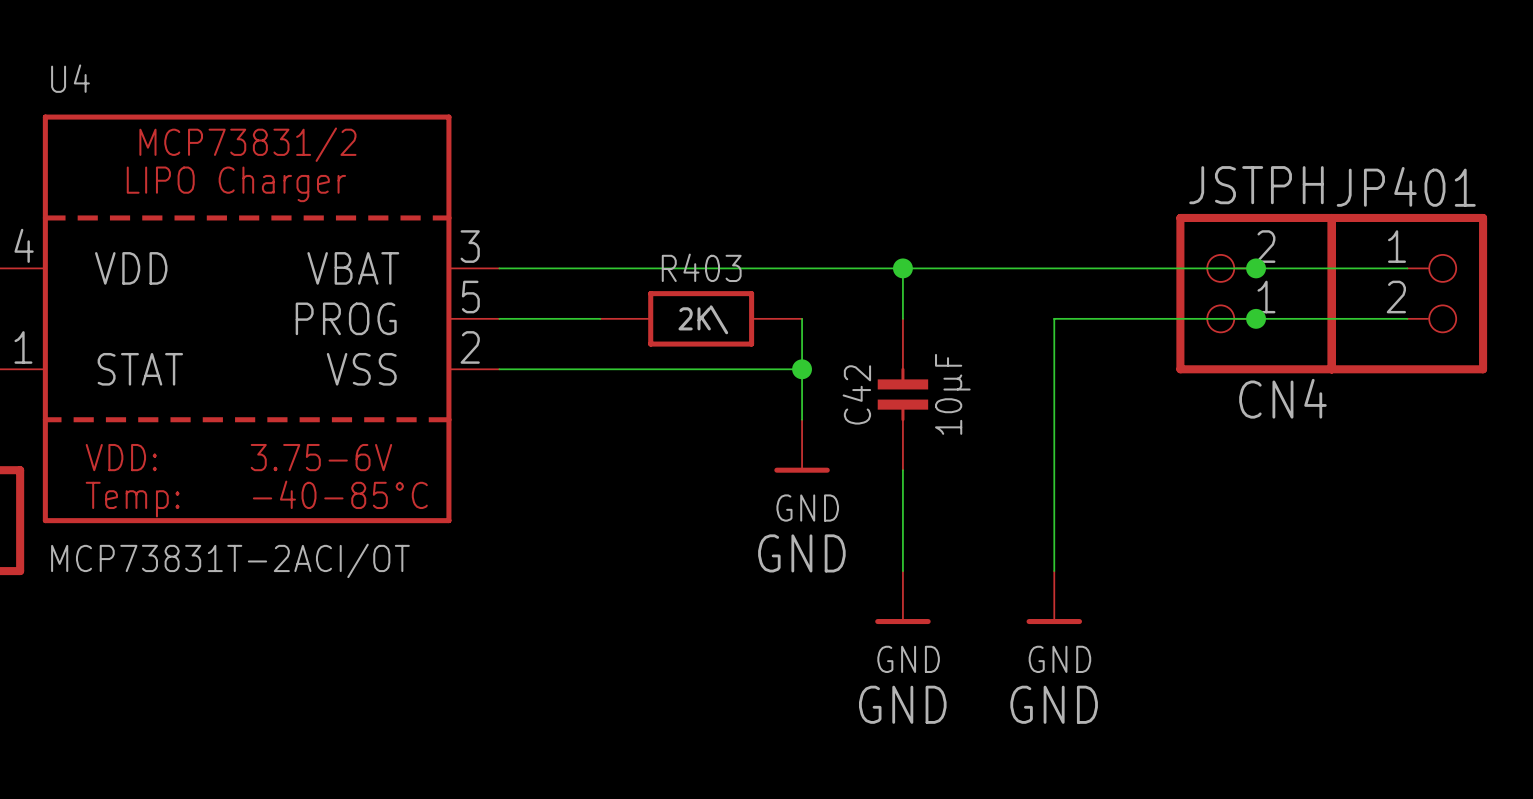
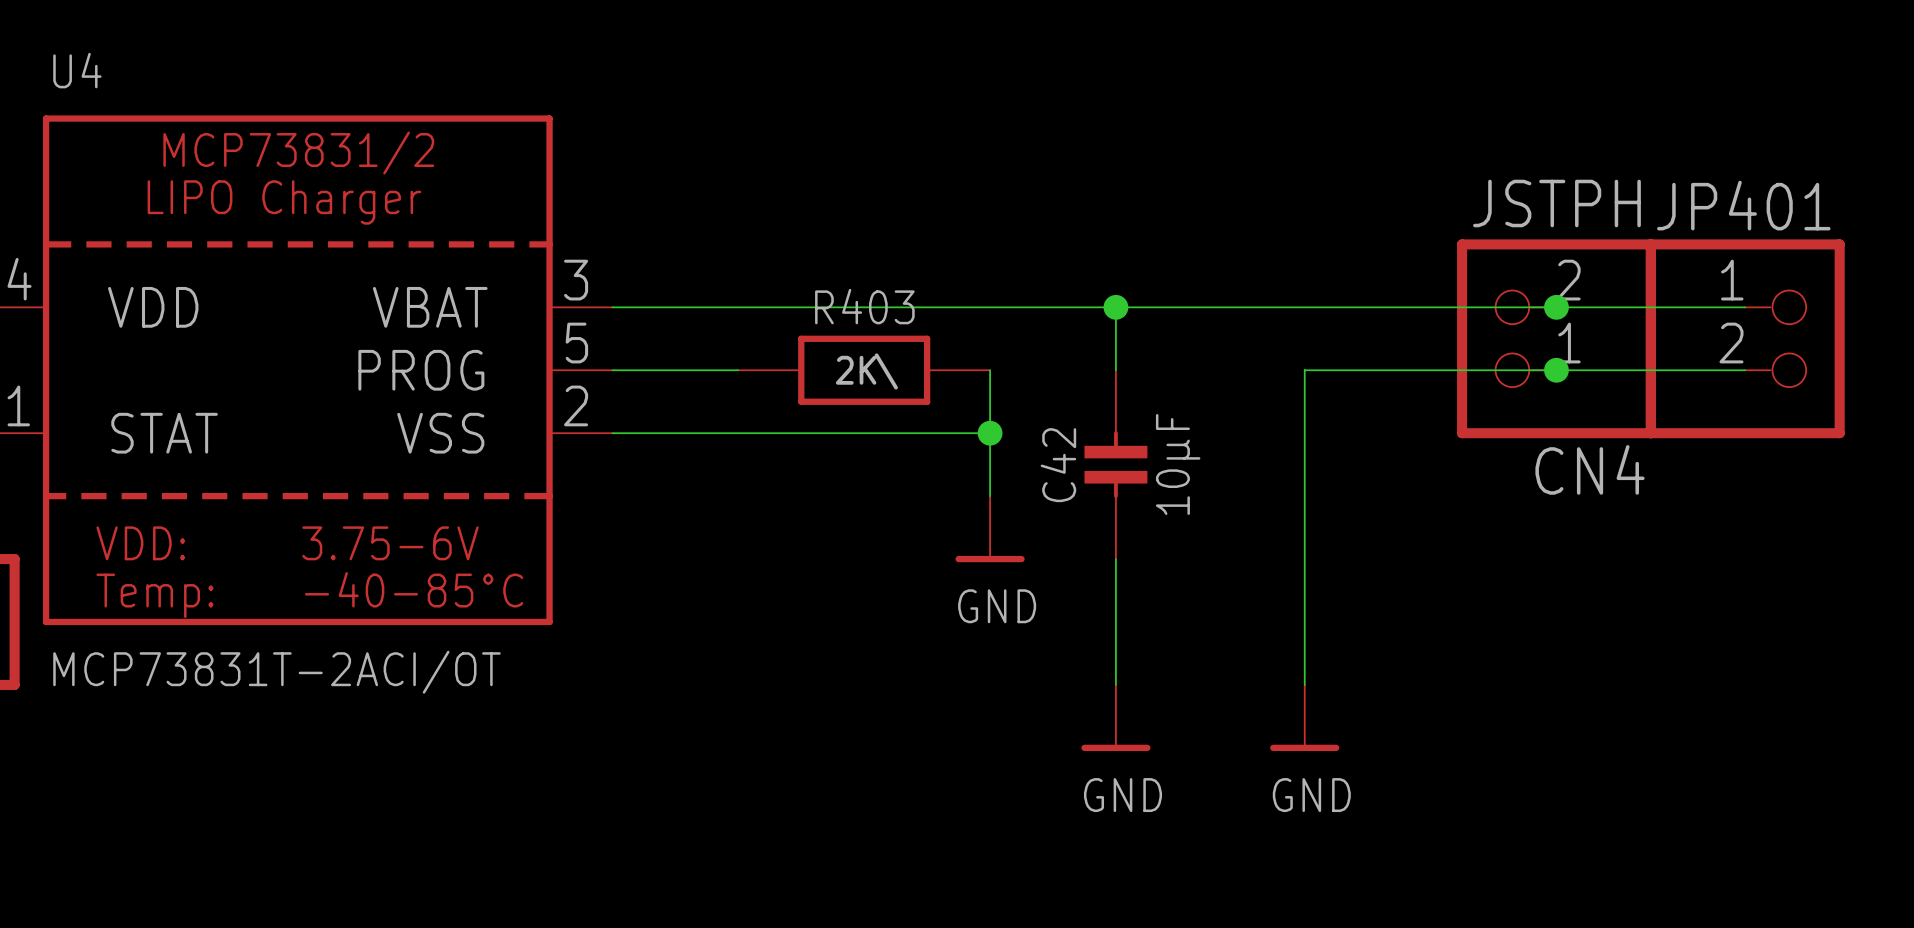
label: GND (801, 553) -> none
label: GND (902, 704) -> none
label: GND (1054, 704) -> none

